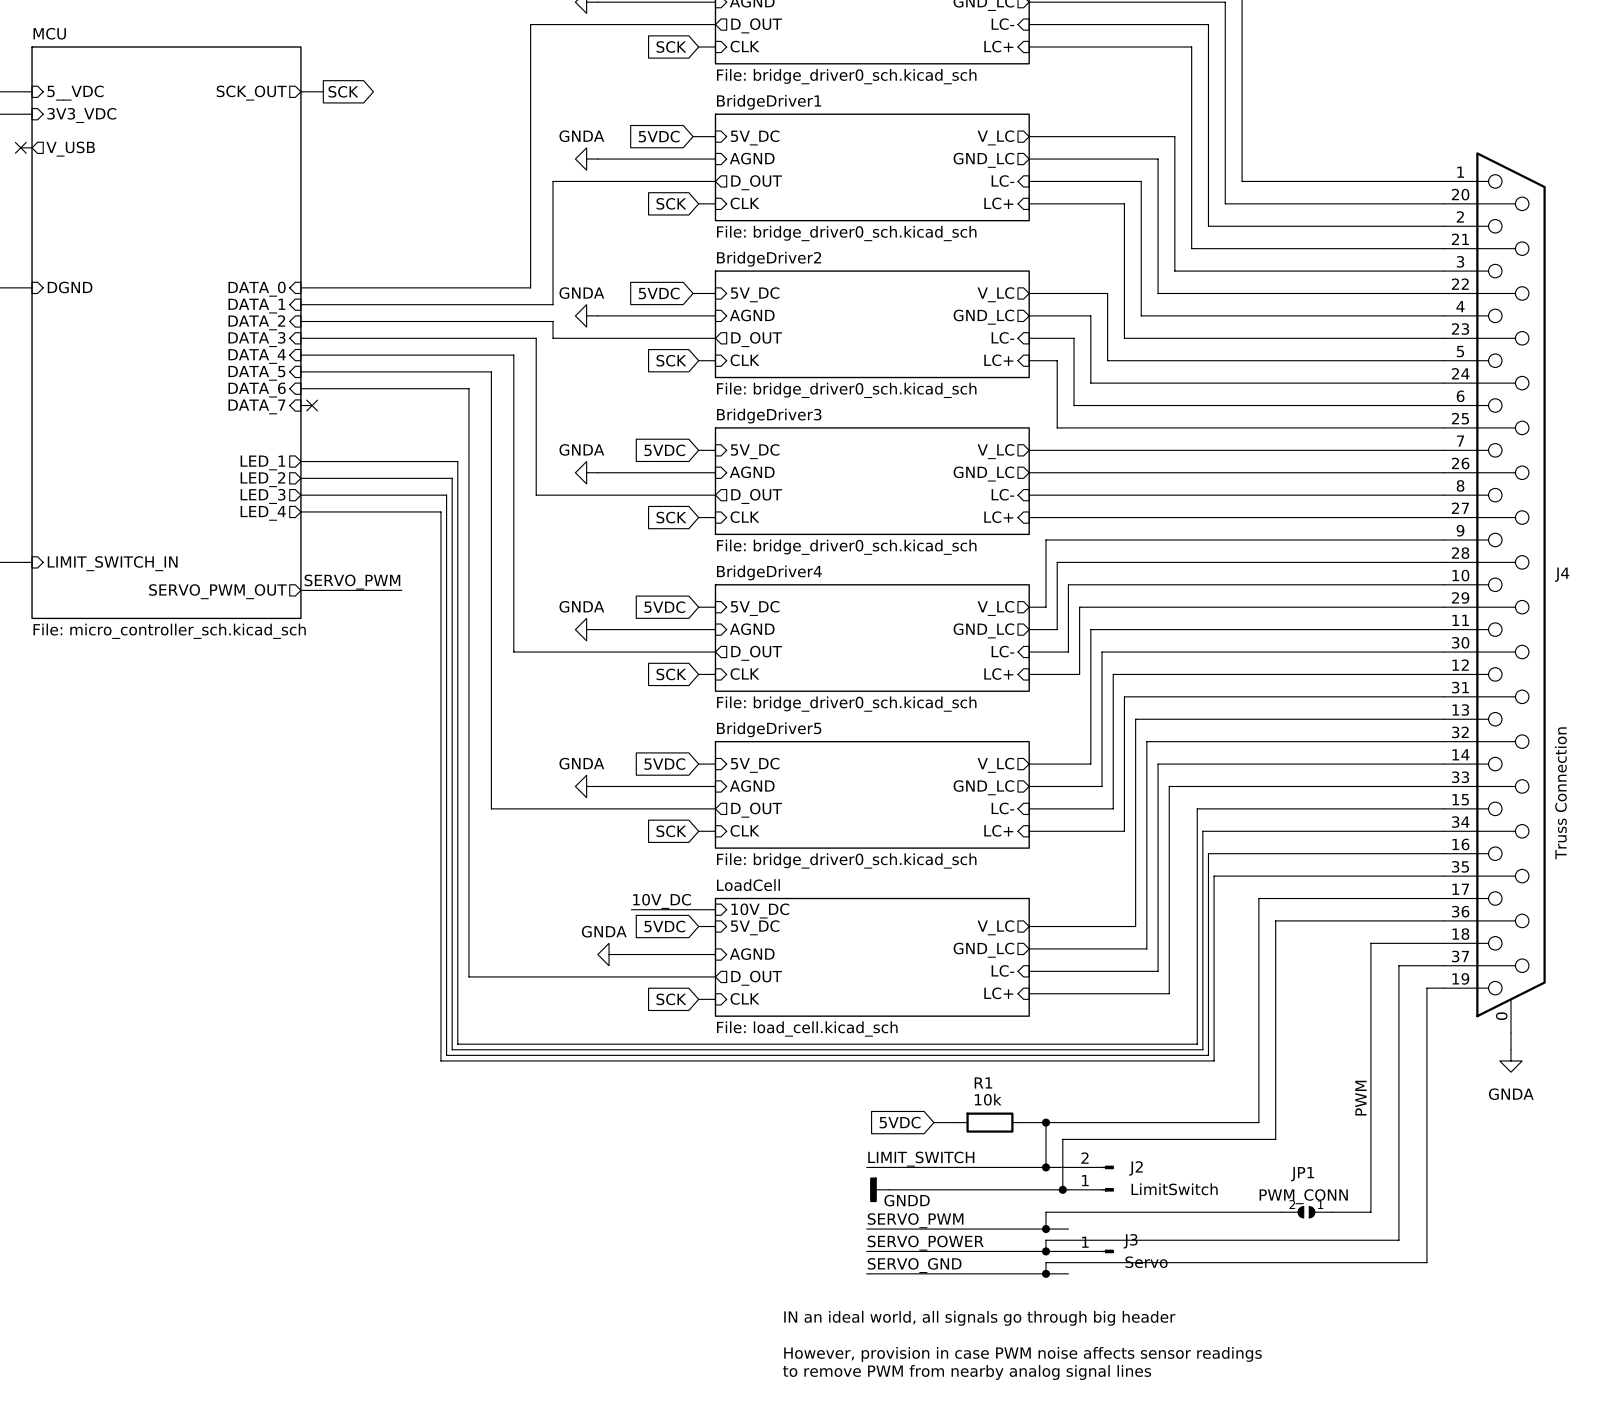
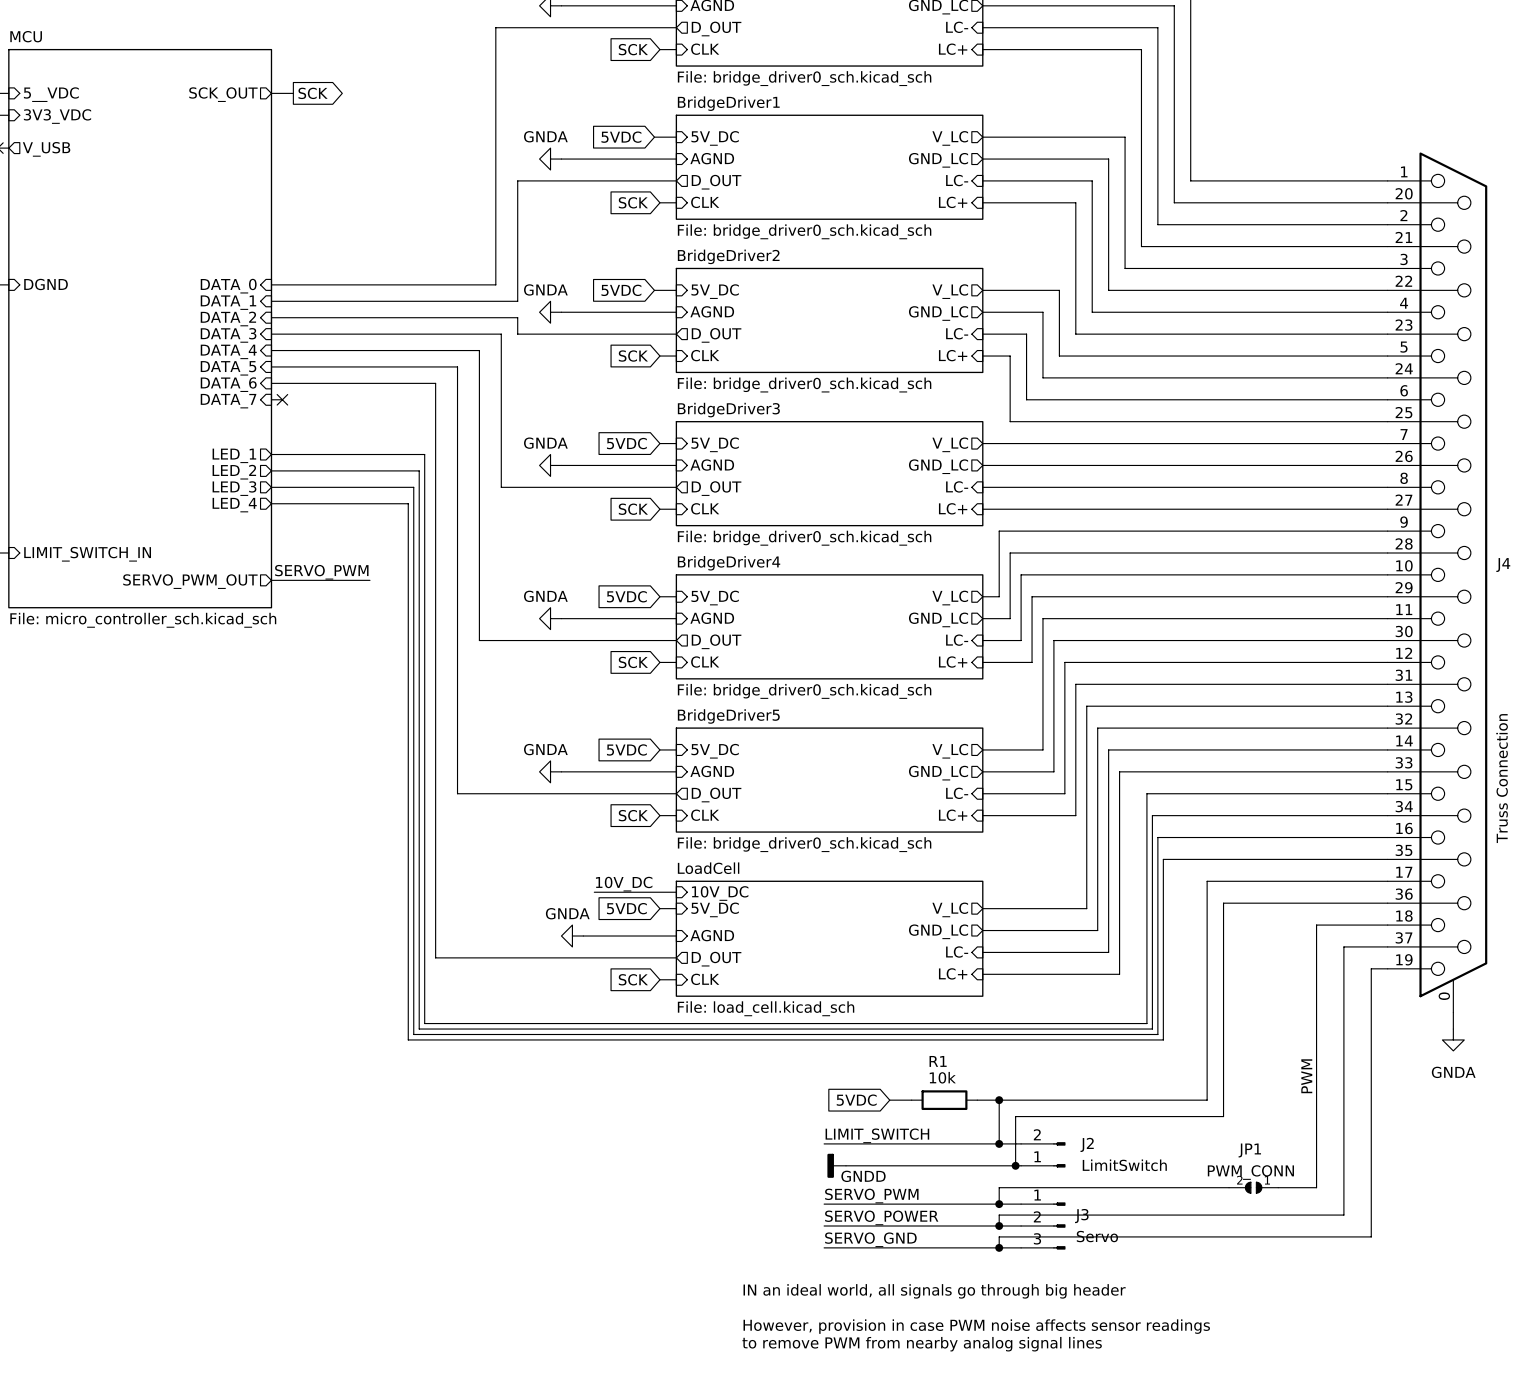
J3 symbol: [1068, 1249, 1114, 1254] -> [1021, 1202, 1066, 1250]

